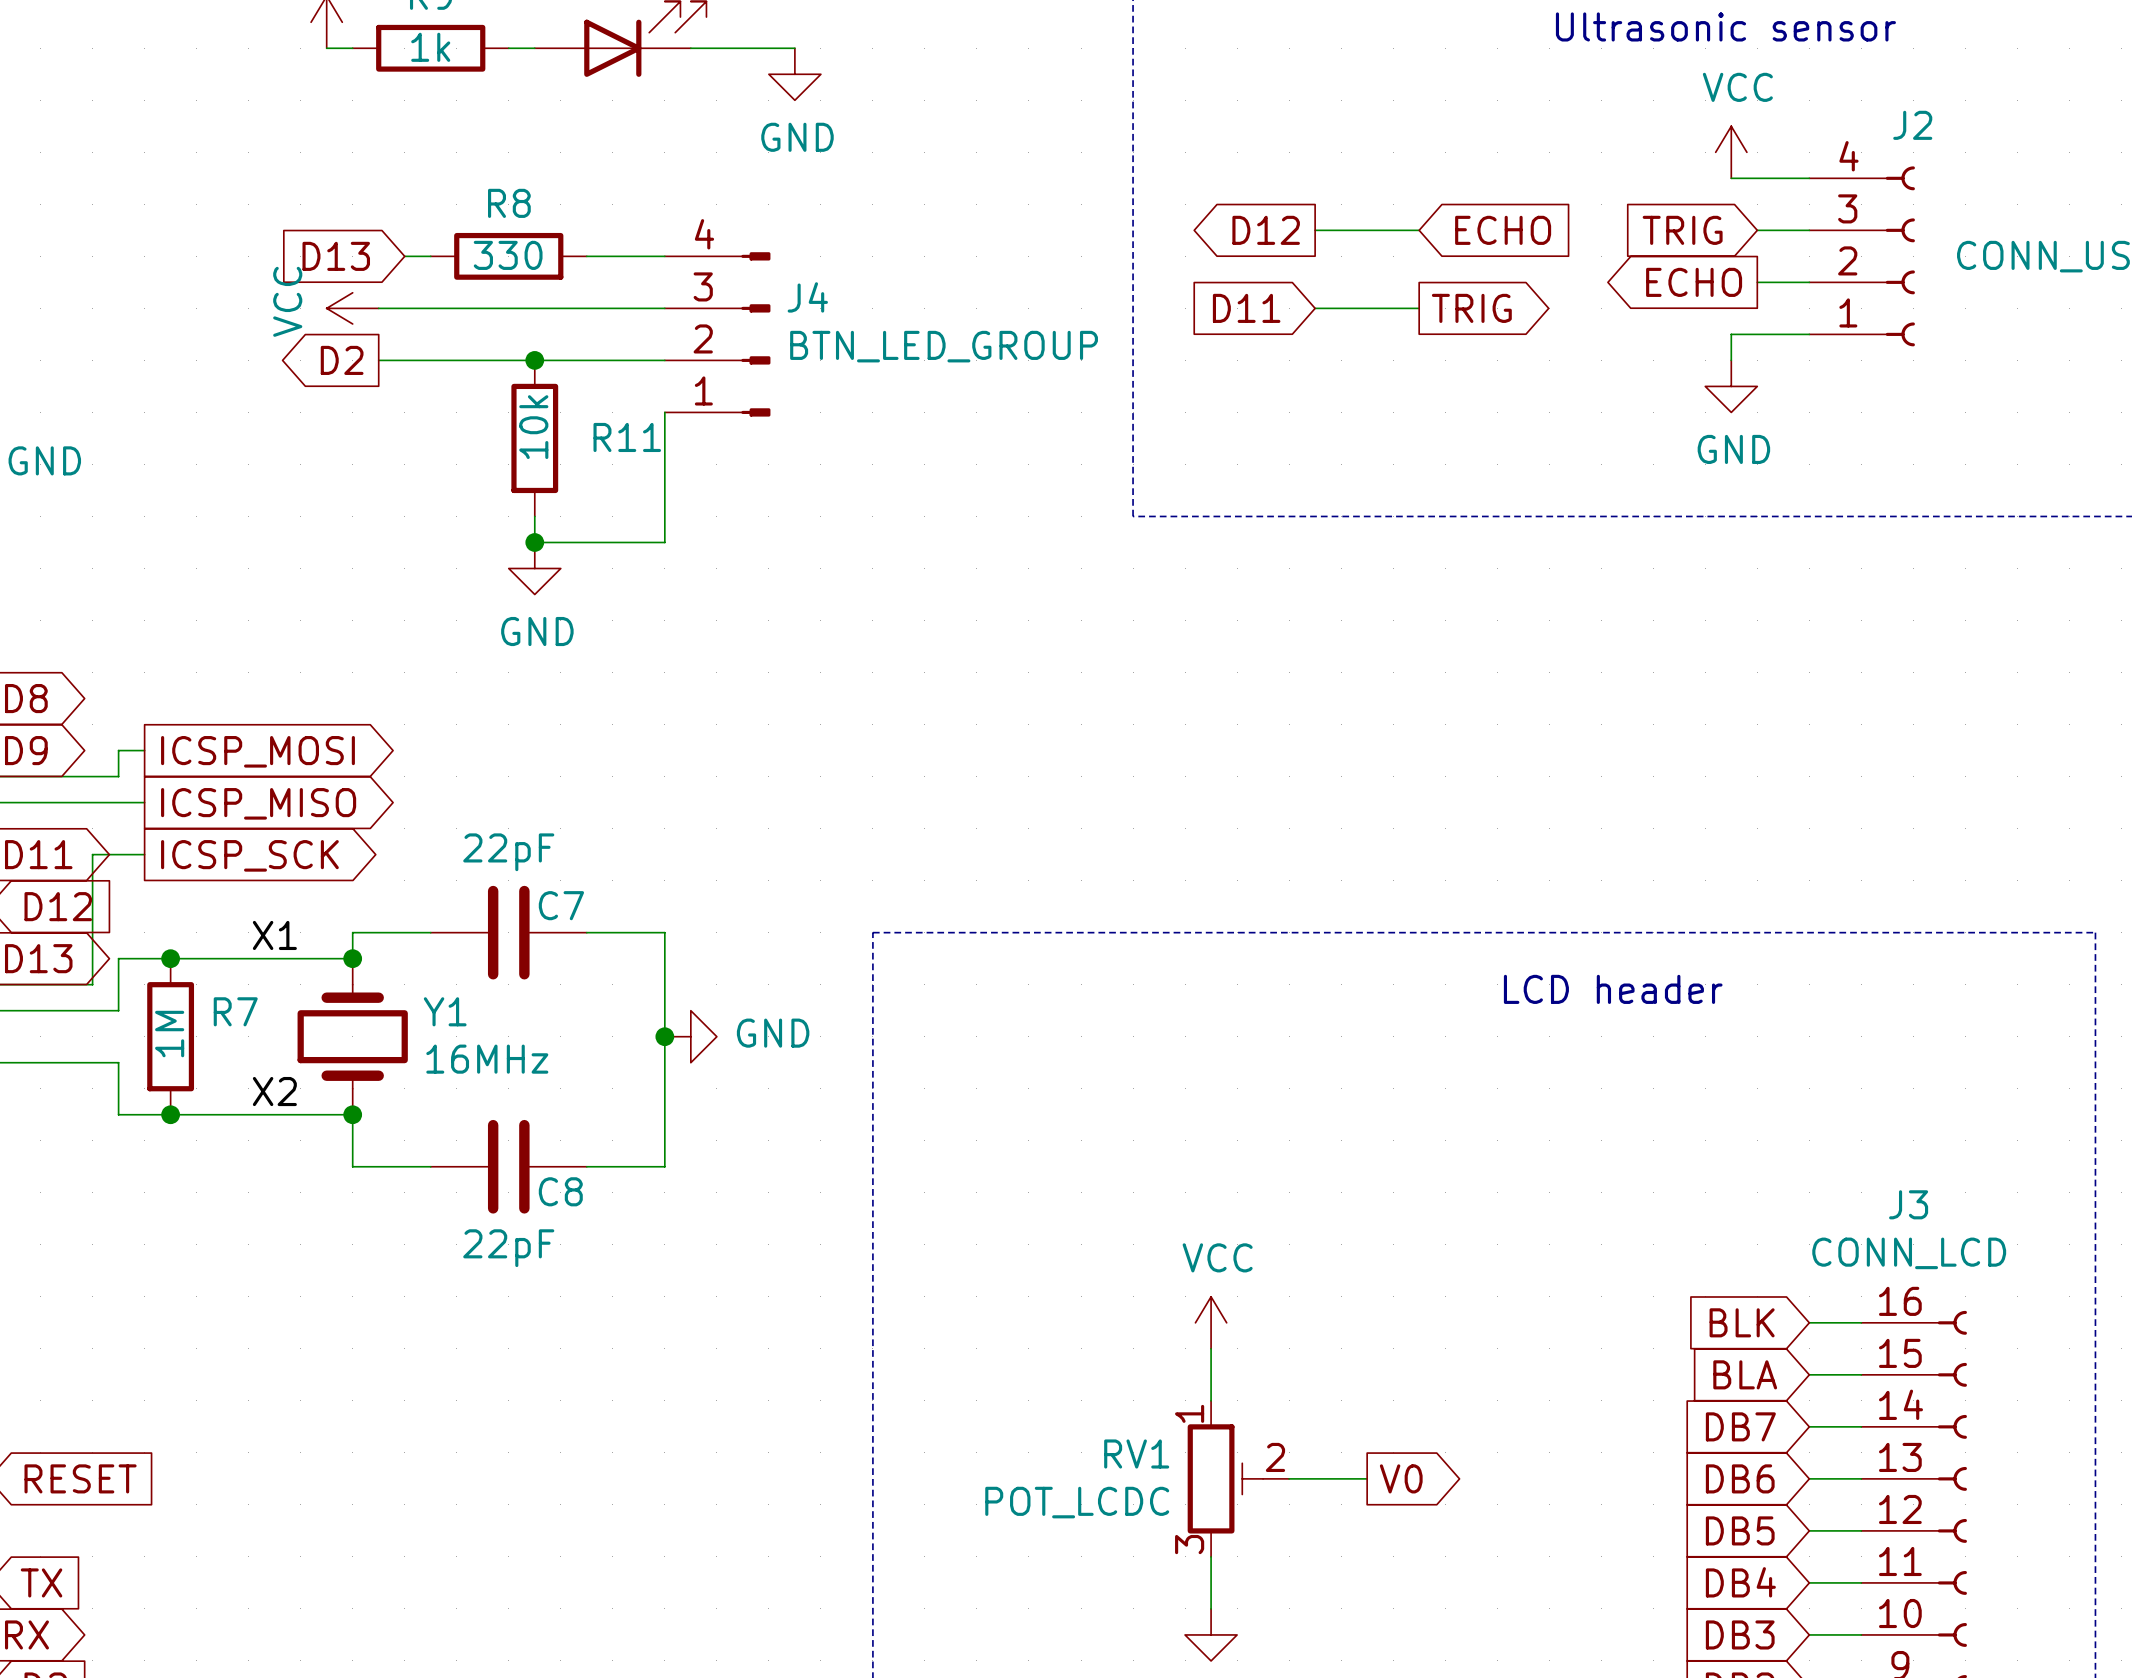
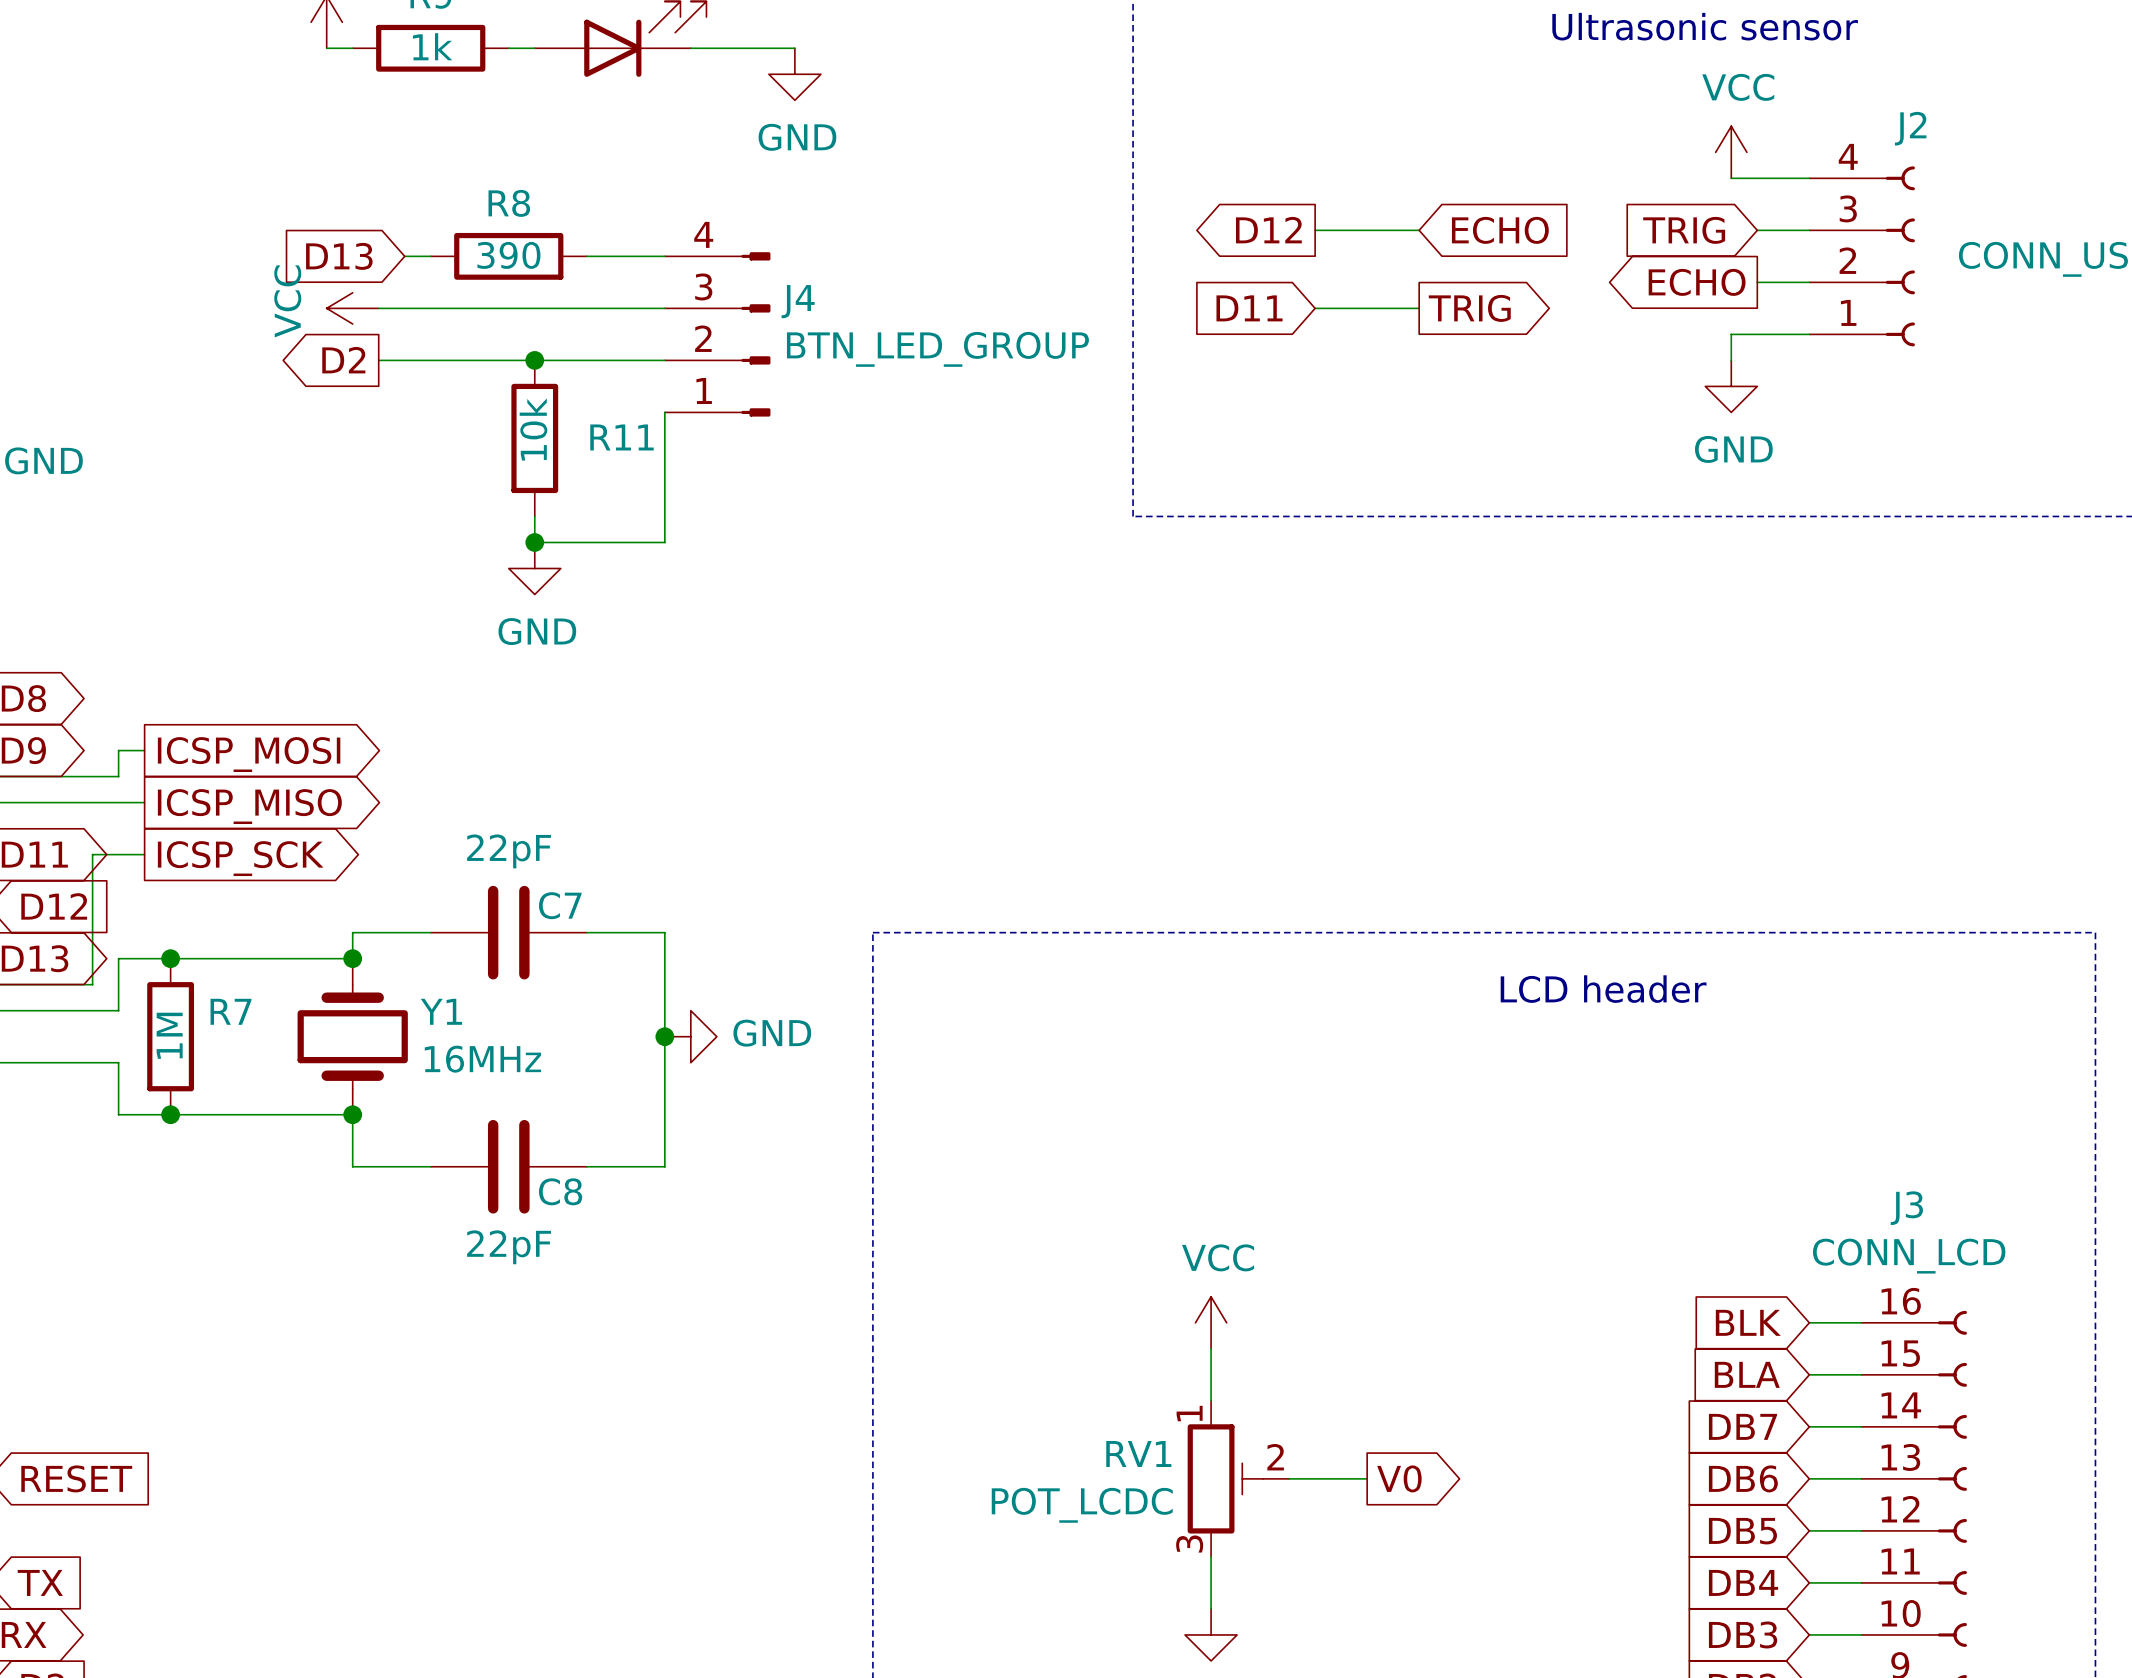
R8 value: 330 (508, 255) -> 390 (508, 255)
label: X1 (274, 935) -> none
label: X2 (274, 1091) -> none

